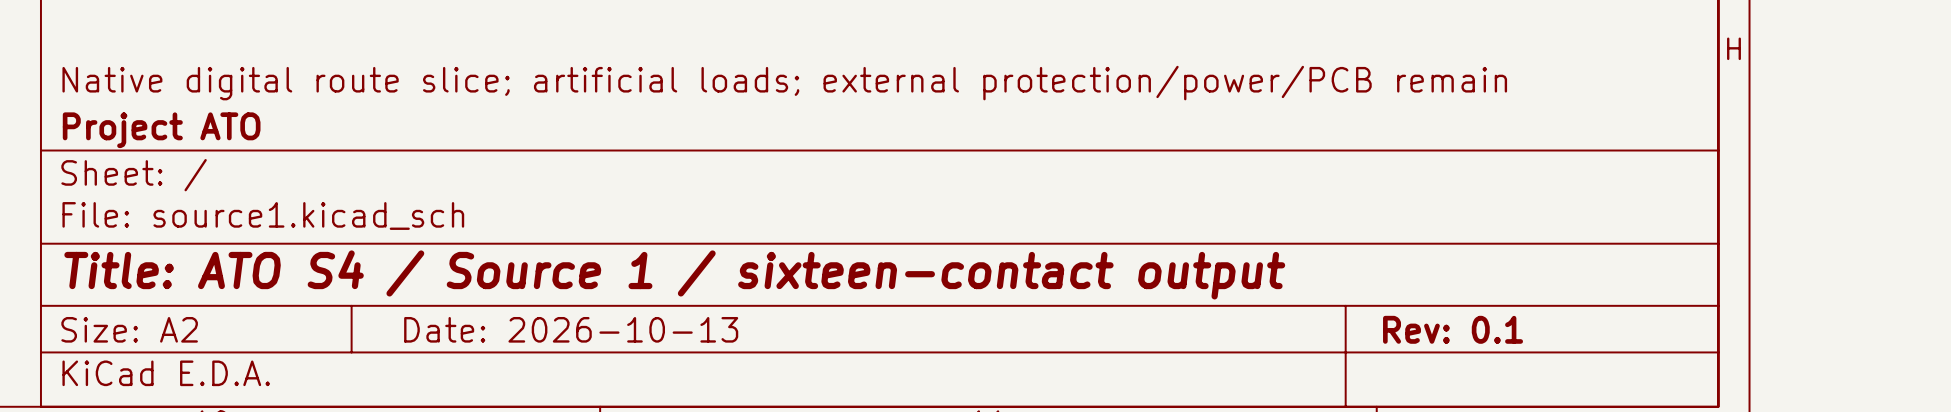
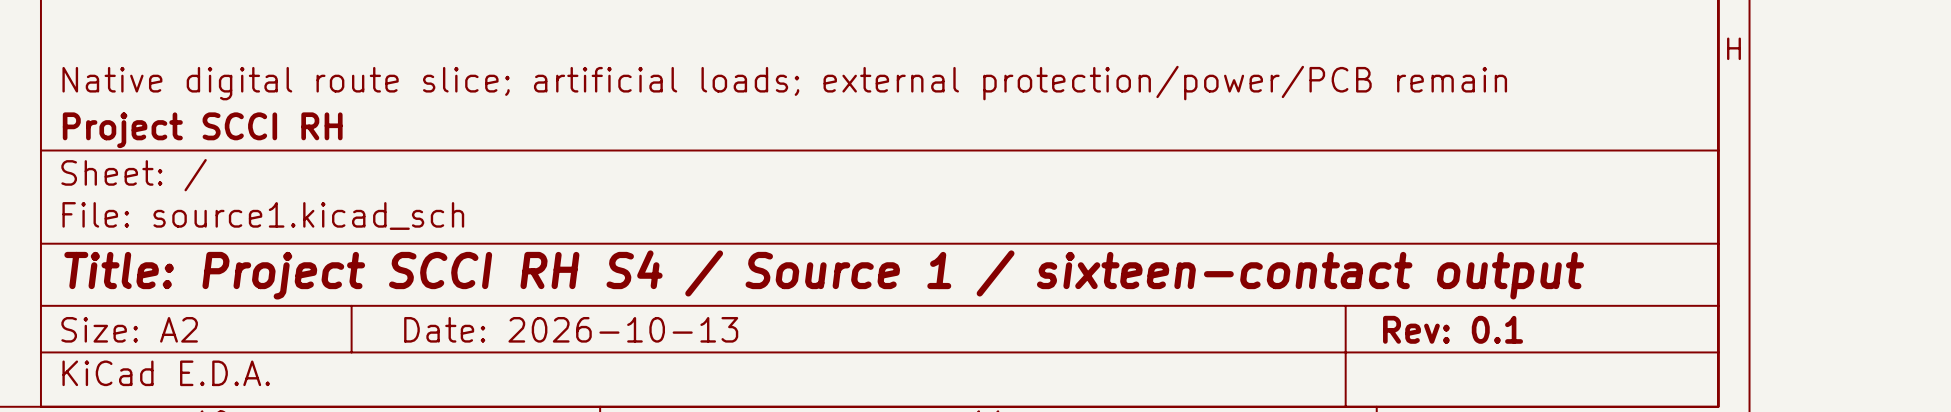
title block: Project ATO (161, 130) -> Project SCCI RH (202, 130)
title block: Title: ATO S4 / Source 1 / sixteen-contact output (674, 274) -> Title: Project SCCI RH S4 / Source 1 / sixteen-contact output (824, 274)

